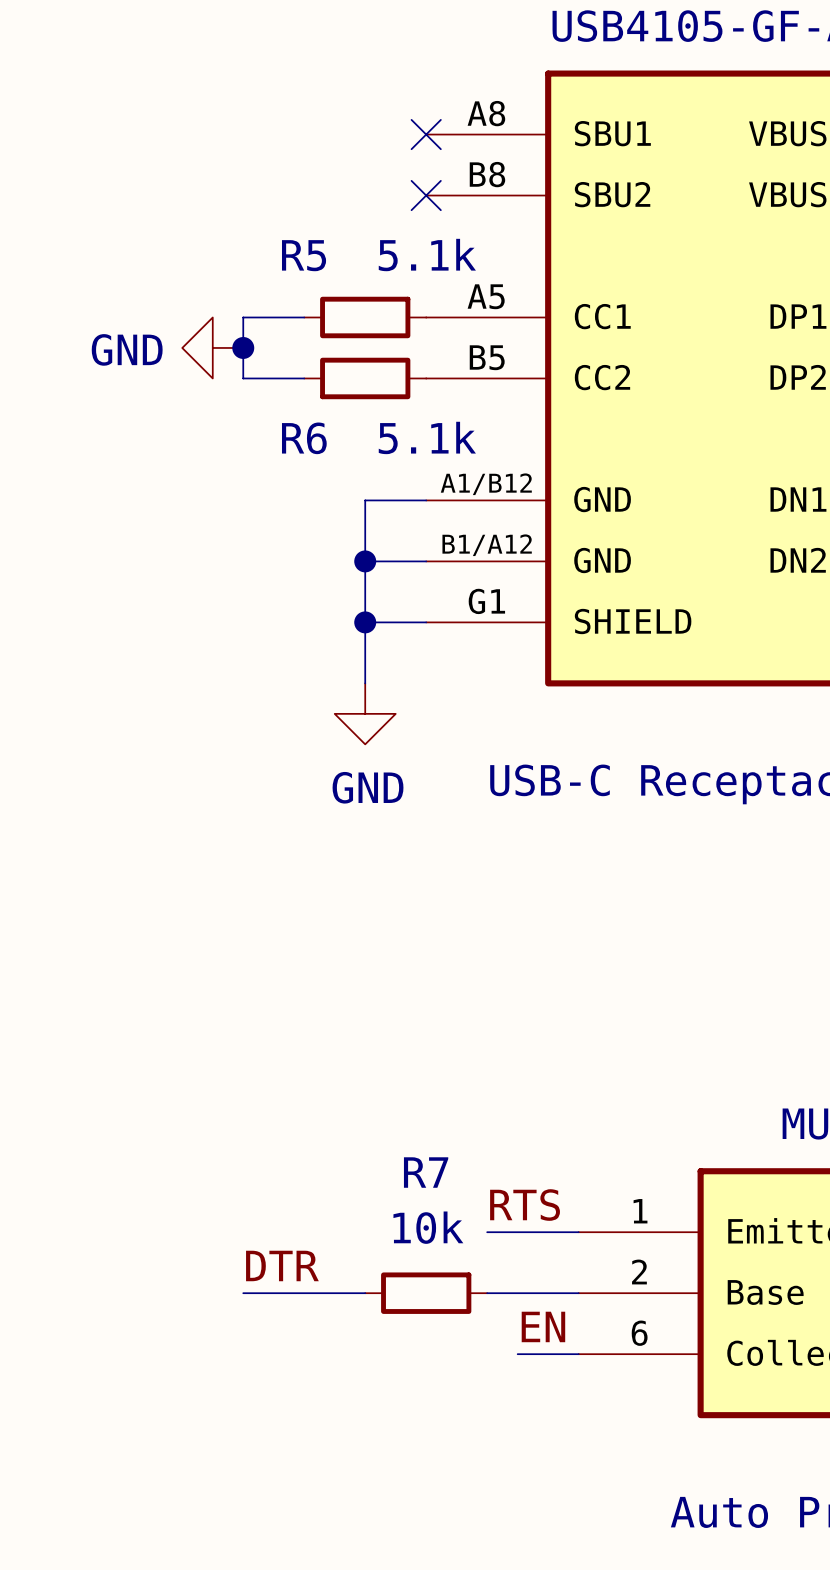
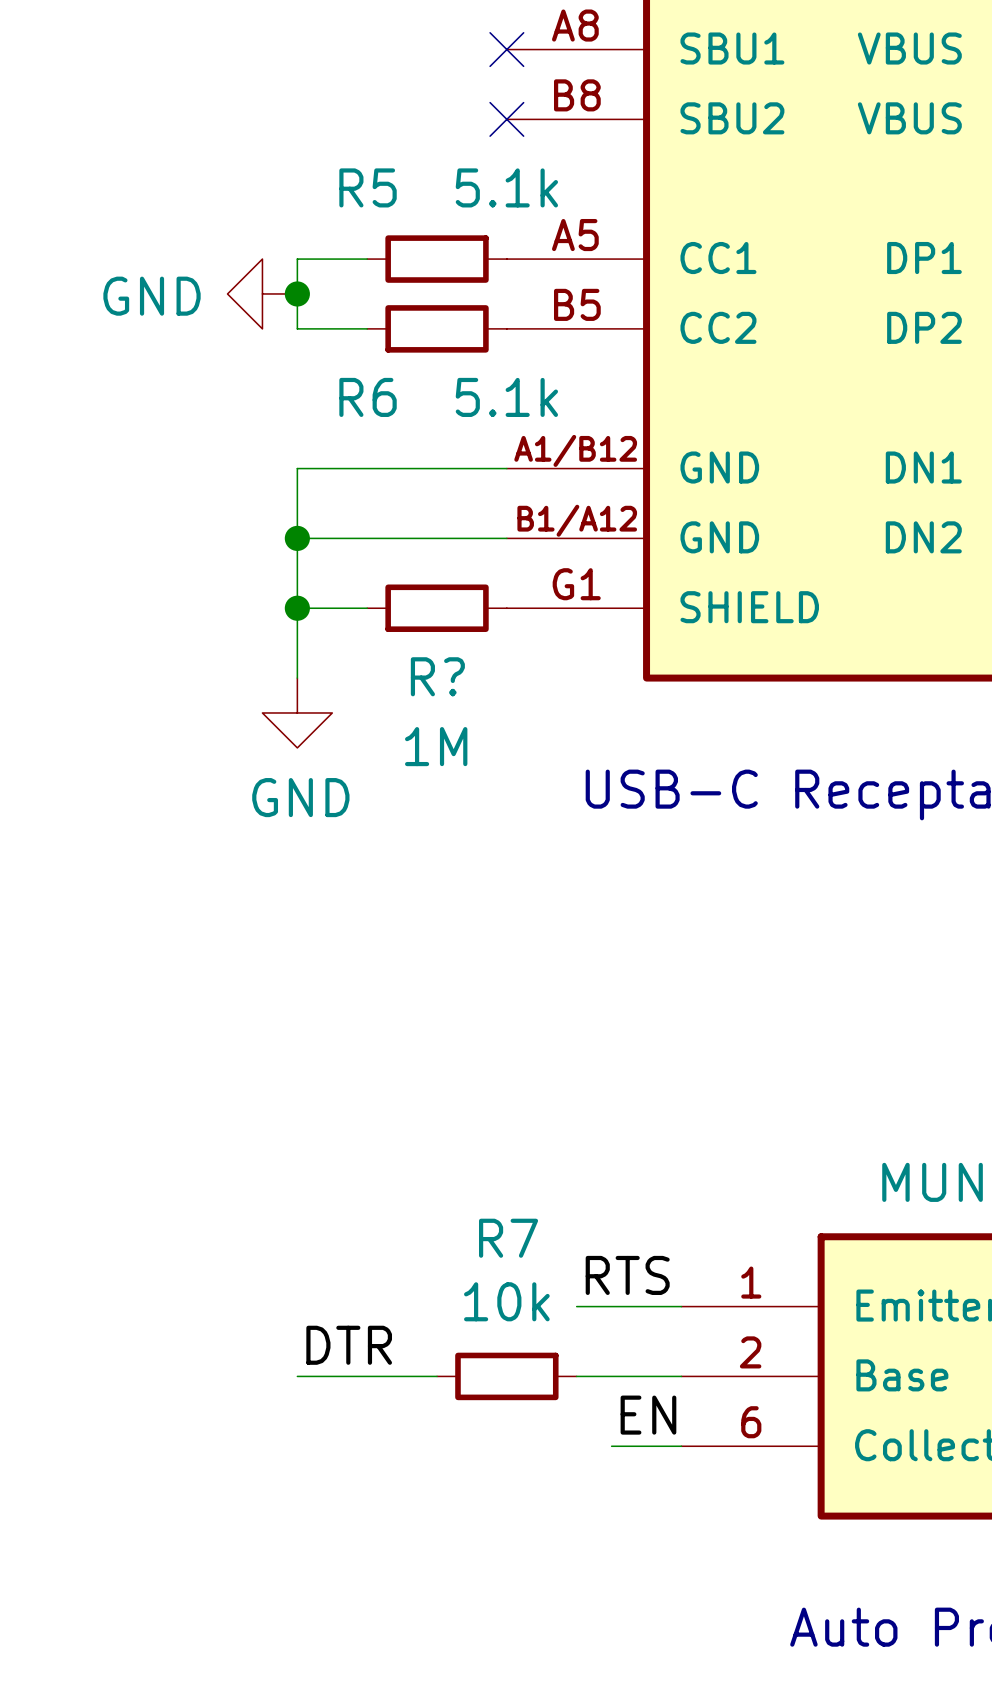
wire: (365, 500) (365, 683) -> (437, 468) (297, 468) (297, 678)
wire: none -> (297, 538) (437, 538)
junction: none -> (297, 538)
junction: (365, 561) -> none
junction: none -> (297, 608)
wire: (365, 622) (426, 622) -> (297, 608) (367, 608)
junction: (365, 622) -> none
R?: none -> 1M (437, 608)
power symbol position: GND (365, 713) -> GND (297, 712)

